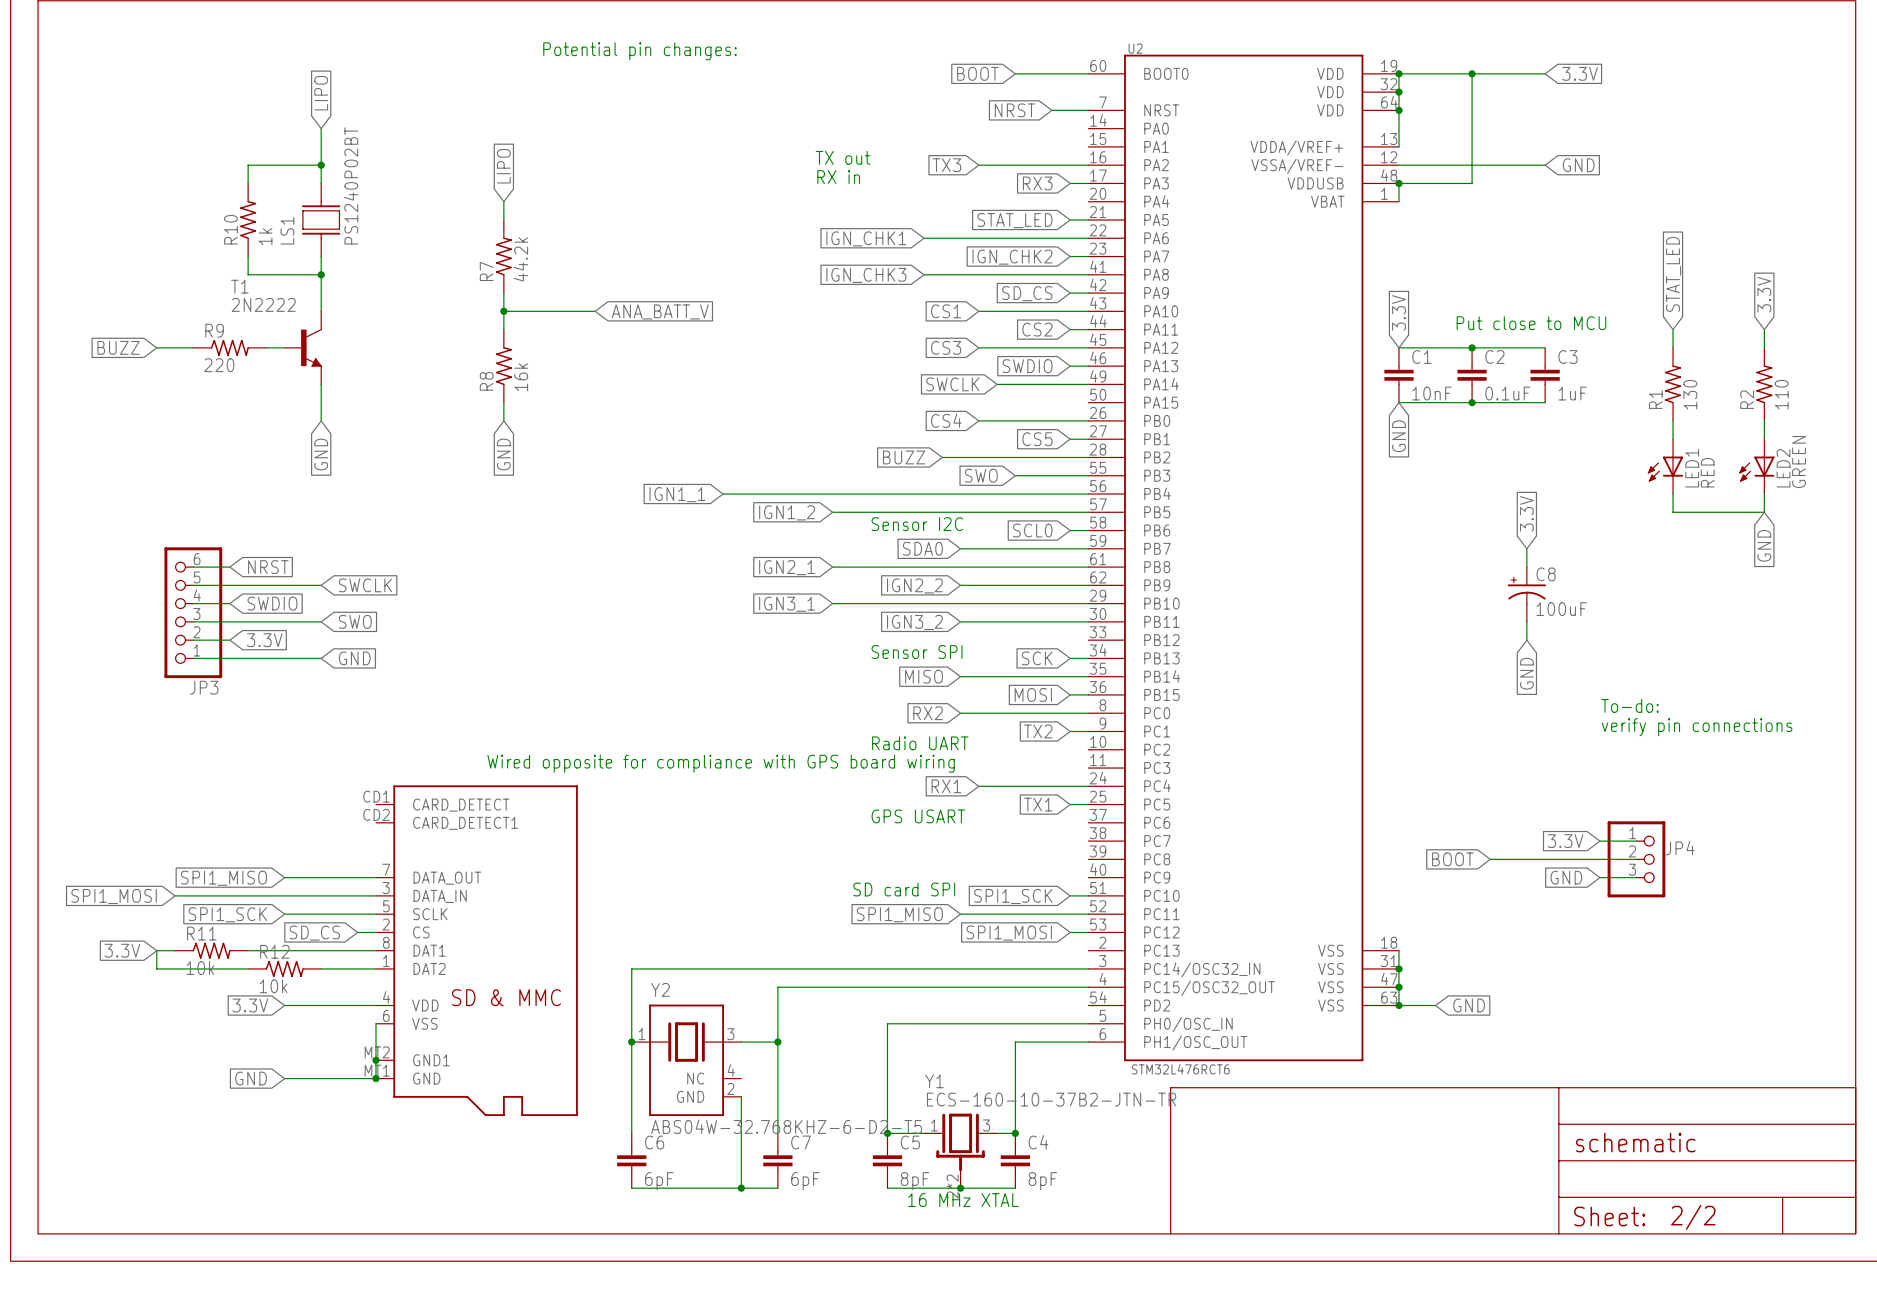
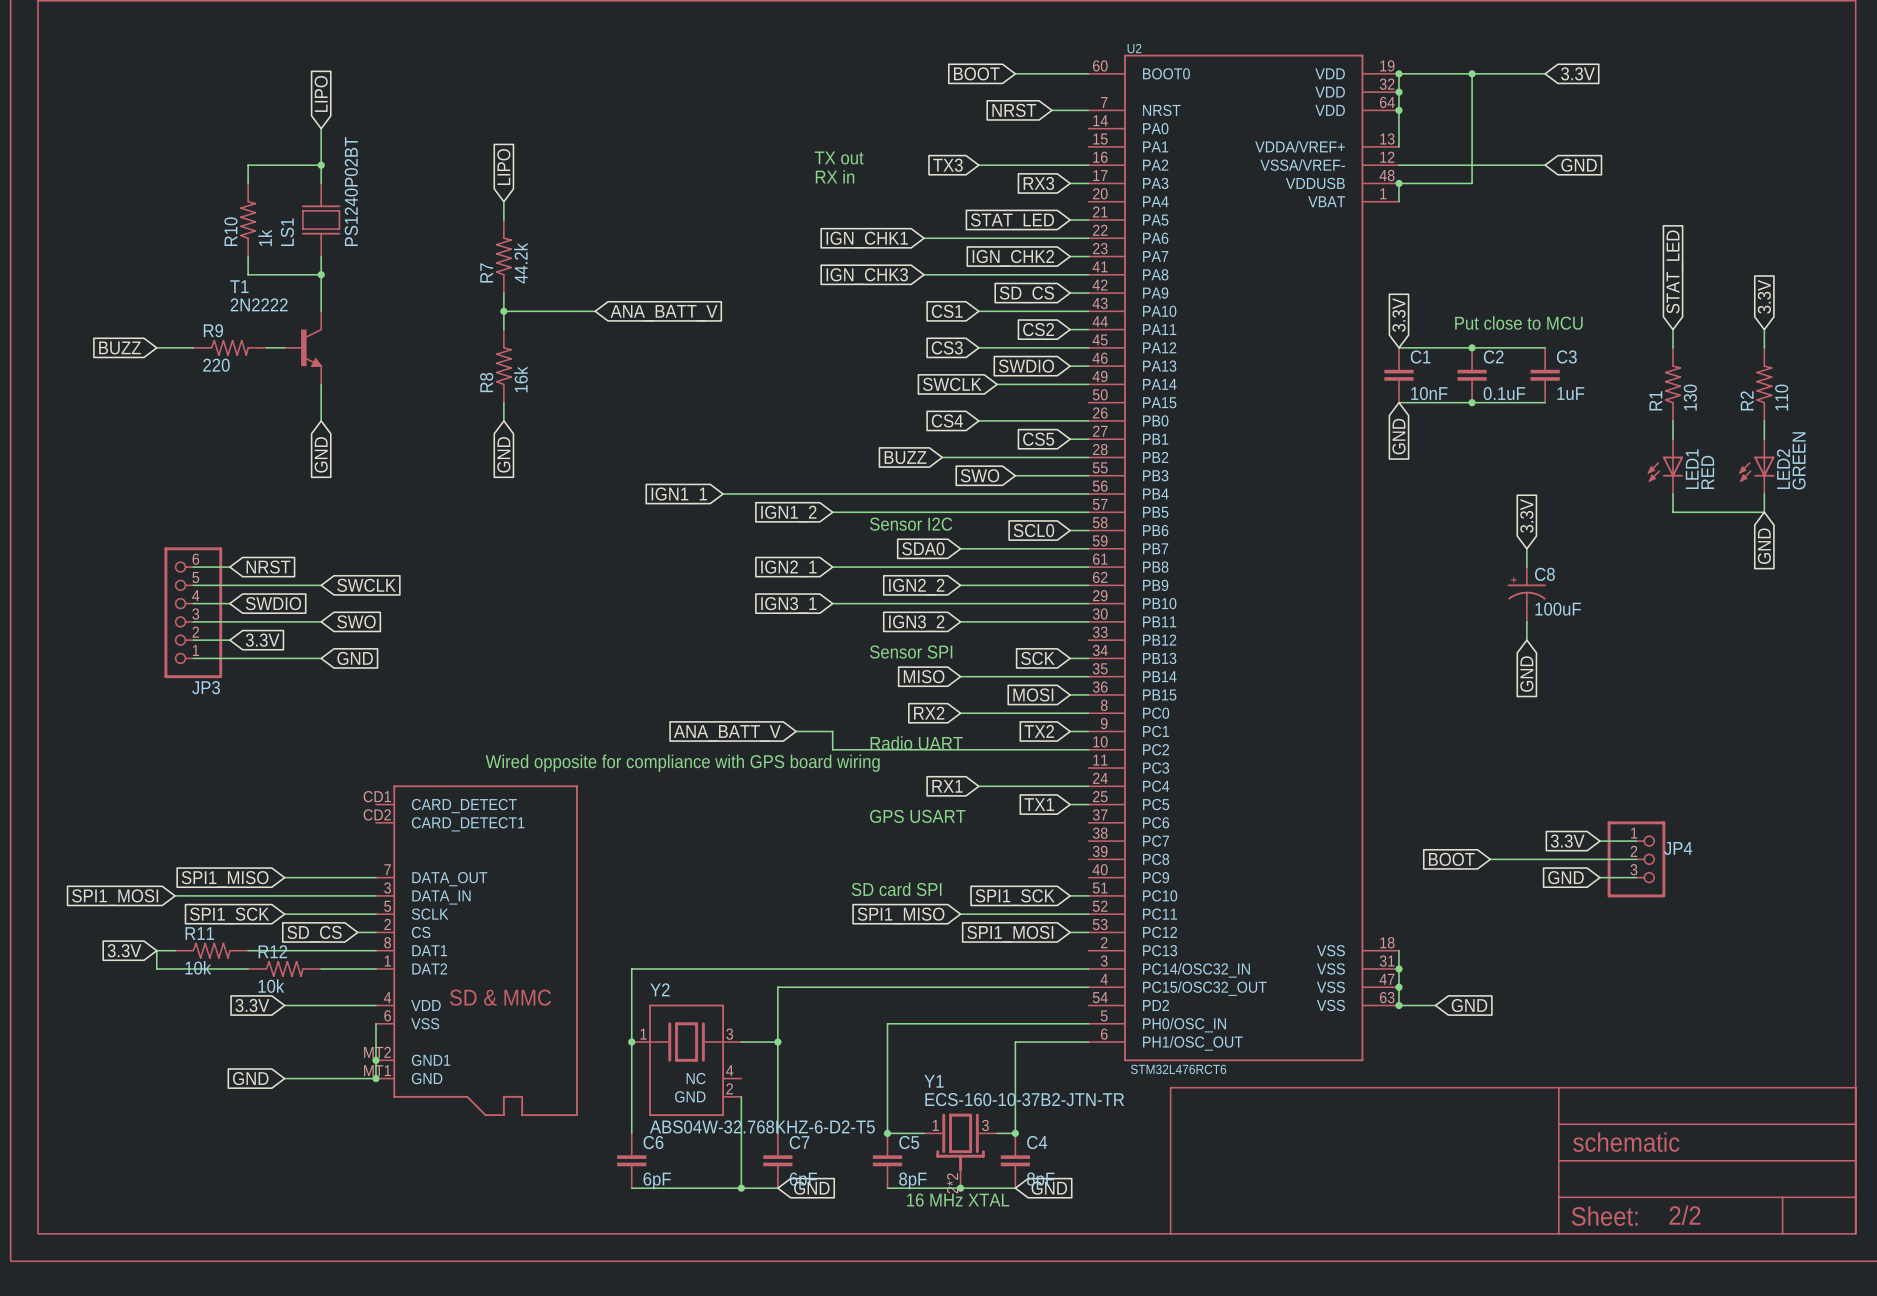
text: Potential pin changes: (639, 51) -> none
text: To-do: (1629, 705) -> none
text: verify pin connections (1697, 727) -> none
wire: none -> (796, 731) (832, 731) (832, 749) (1088, 749)
global label: none -> ANA_BATT_V (727, 733)
global label: none -> GND (811, 1188)
global label: none -> GND (1049, 1188)

